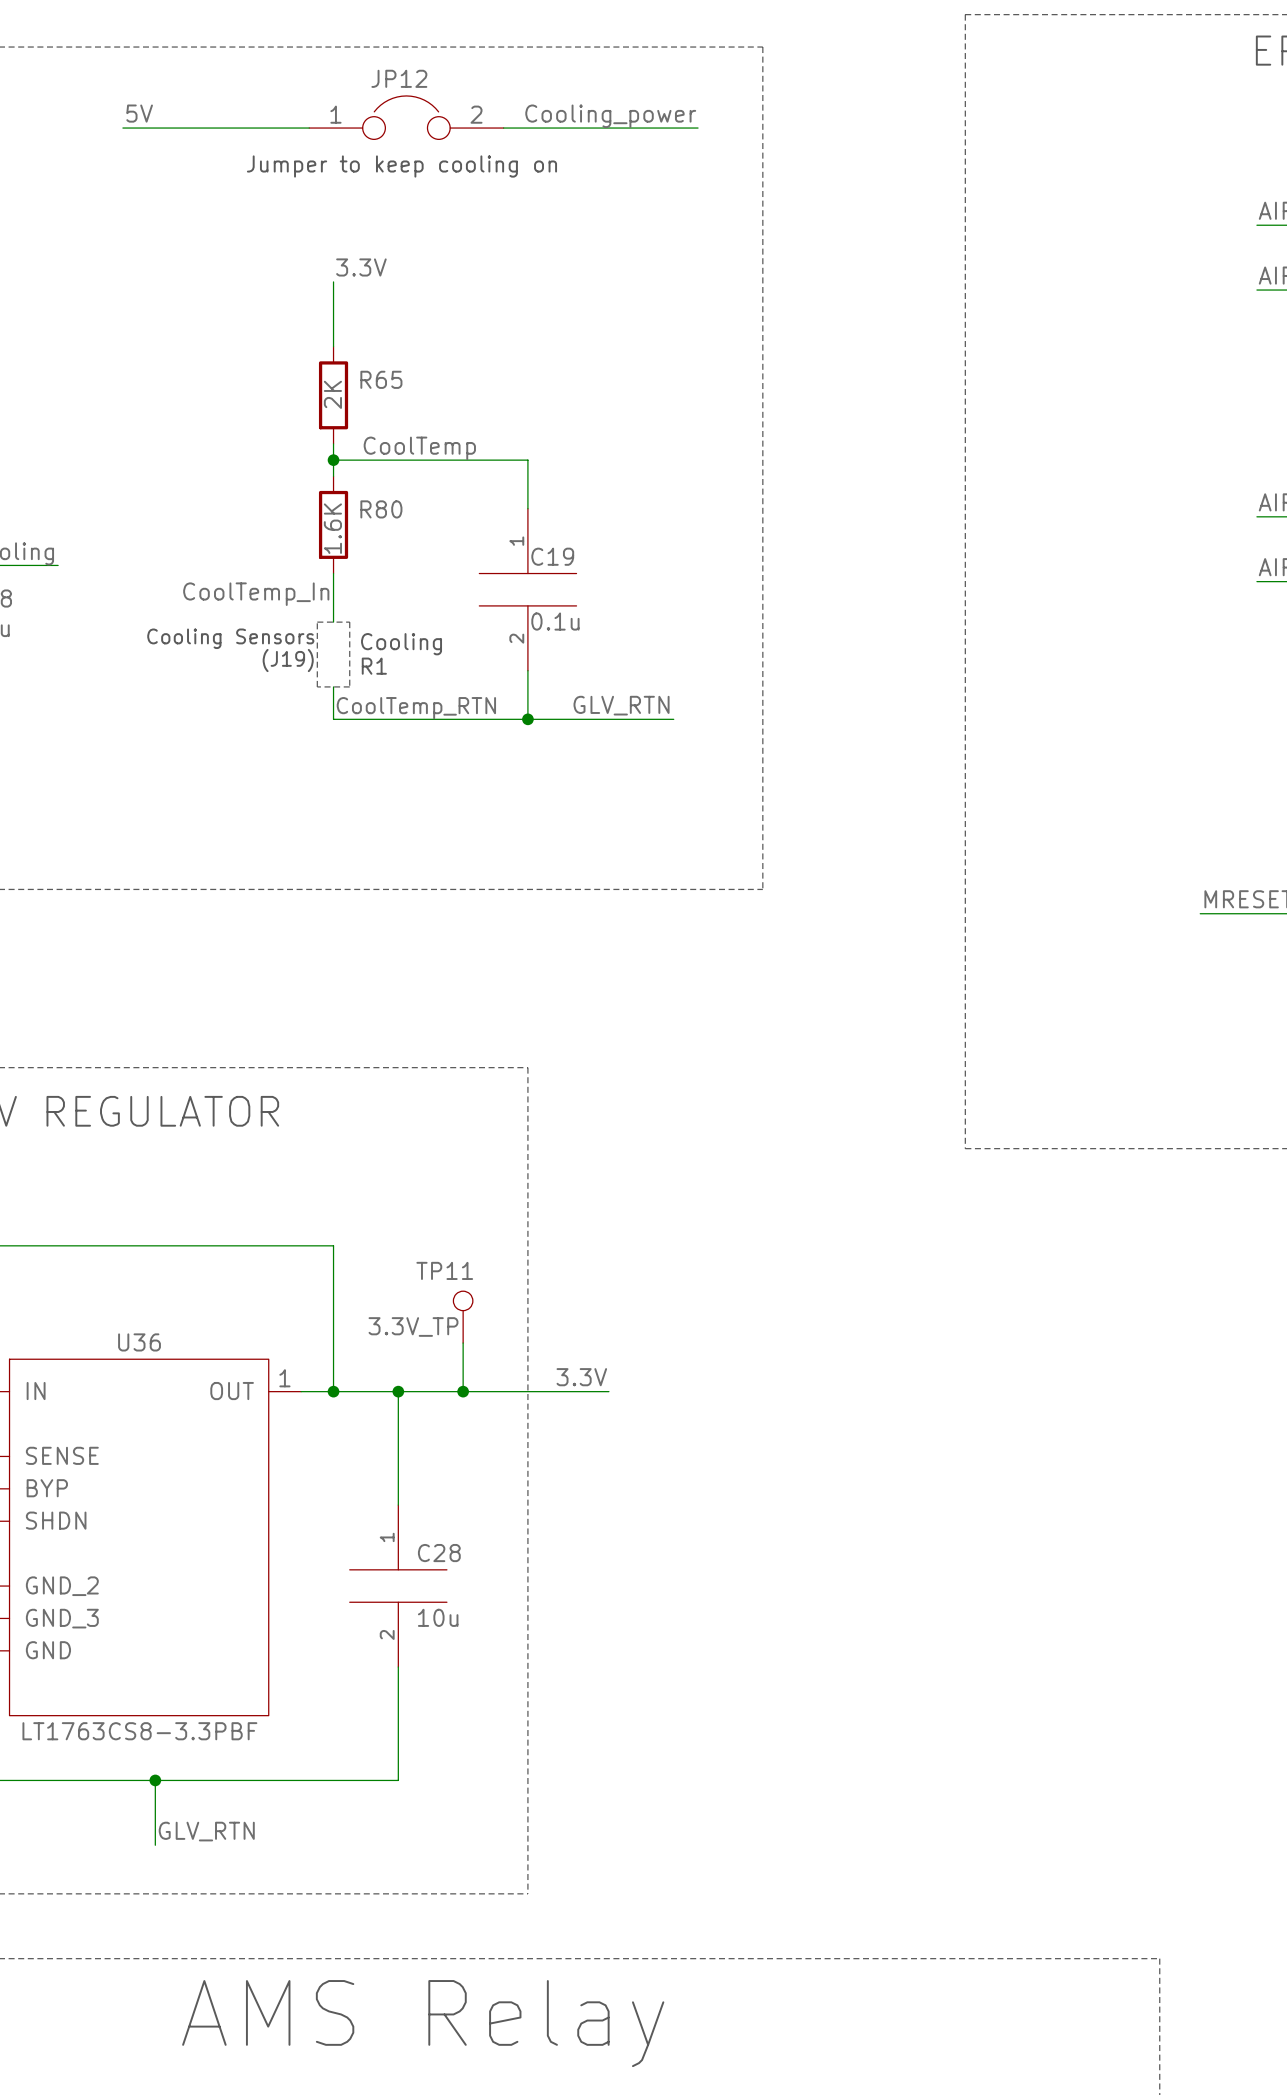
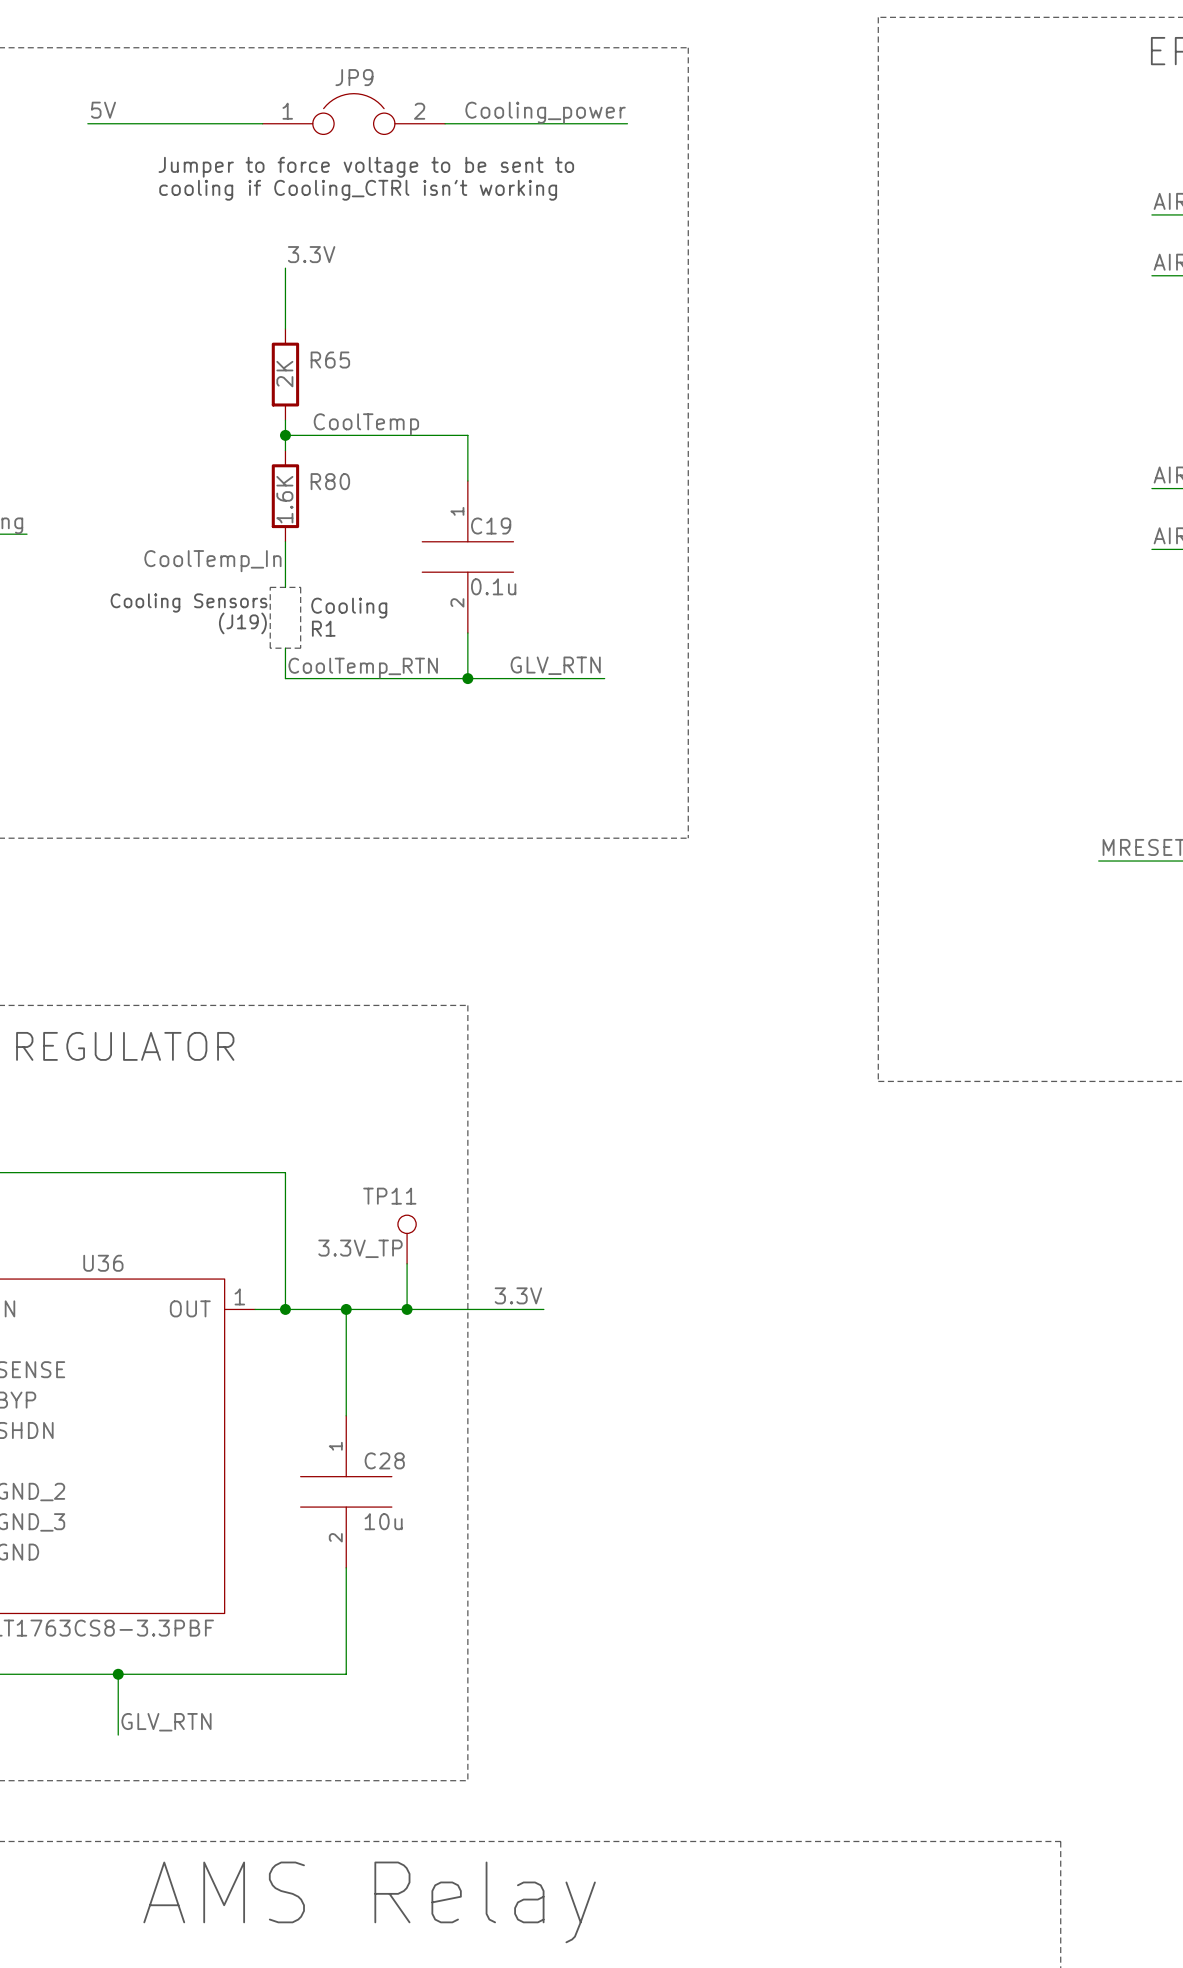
JP12 name: JP12 (399, 78) -> JP9 (354, 77)
text: Jumper to keep cooling on (401, 166) -> none
text: none -> Jumper to force voltage to be sent to (366, 167)
text: none -> cooling if Cooling_CTRl isn't working (358, 190)

